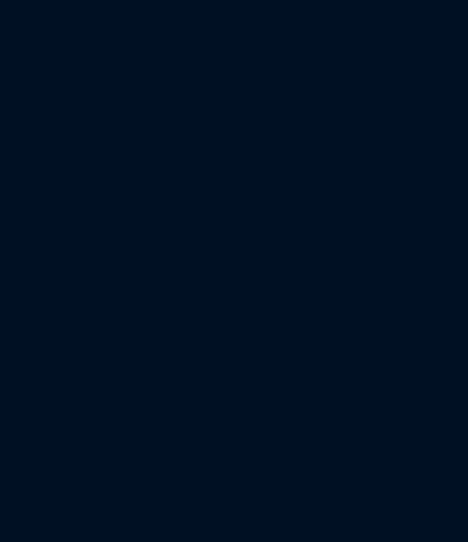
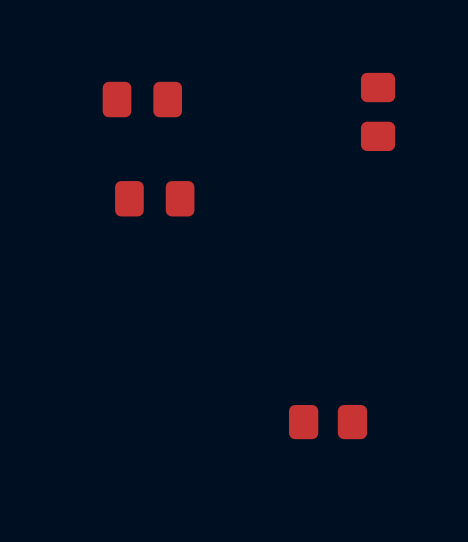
part: none -> (142, 99)
part: none -> (378, 111)
part: none -> (154, 198)
part: none -> (328, 422)

